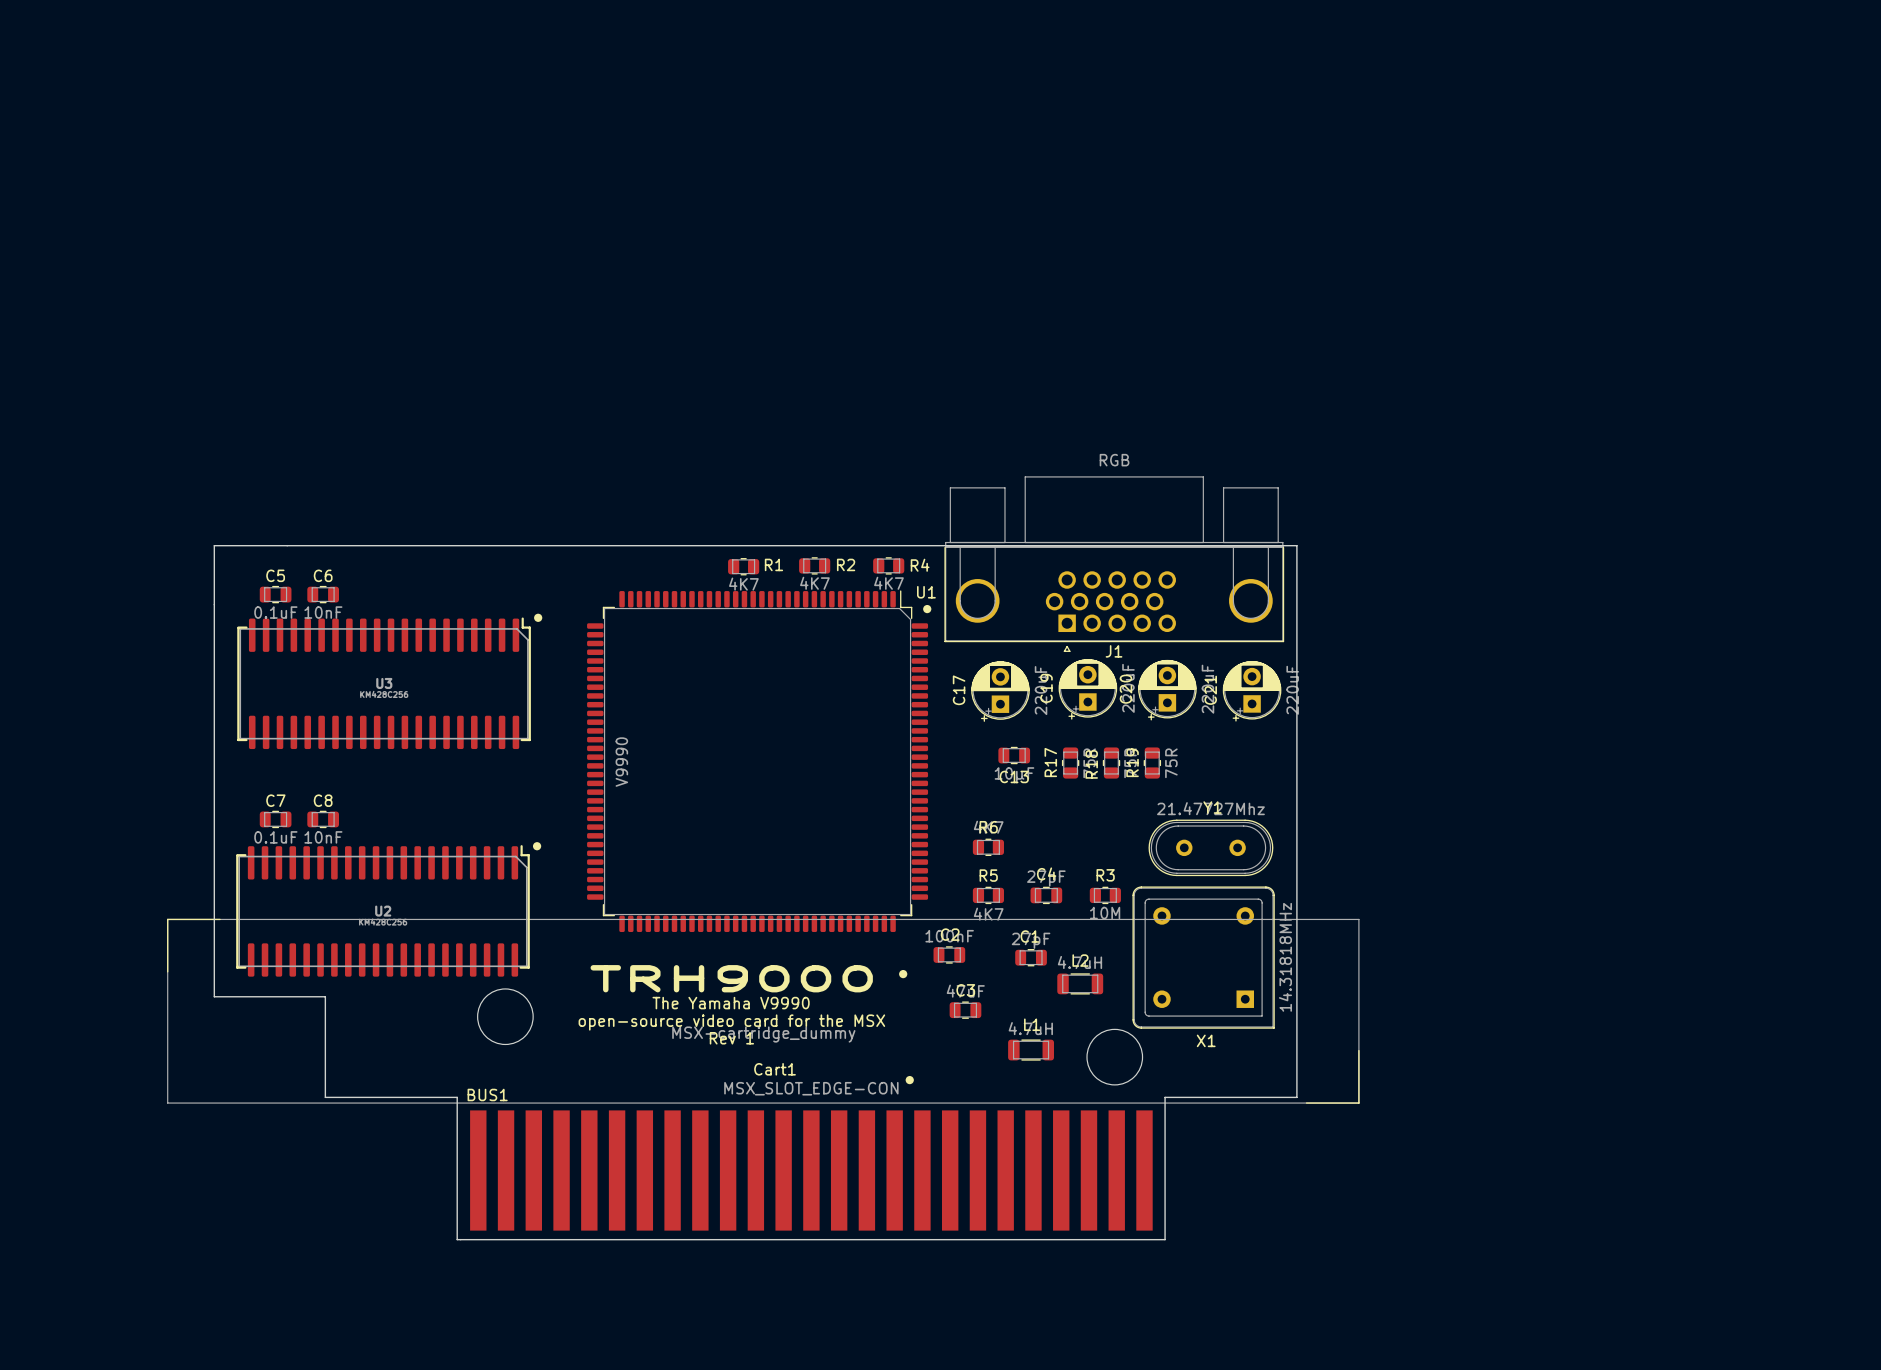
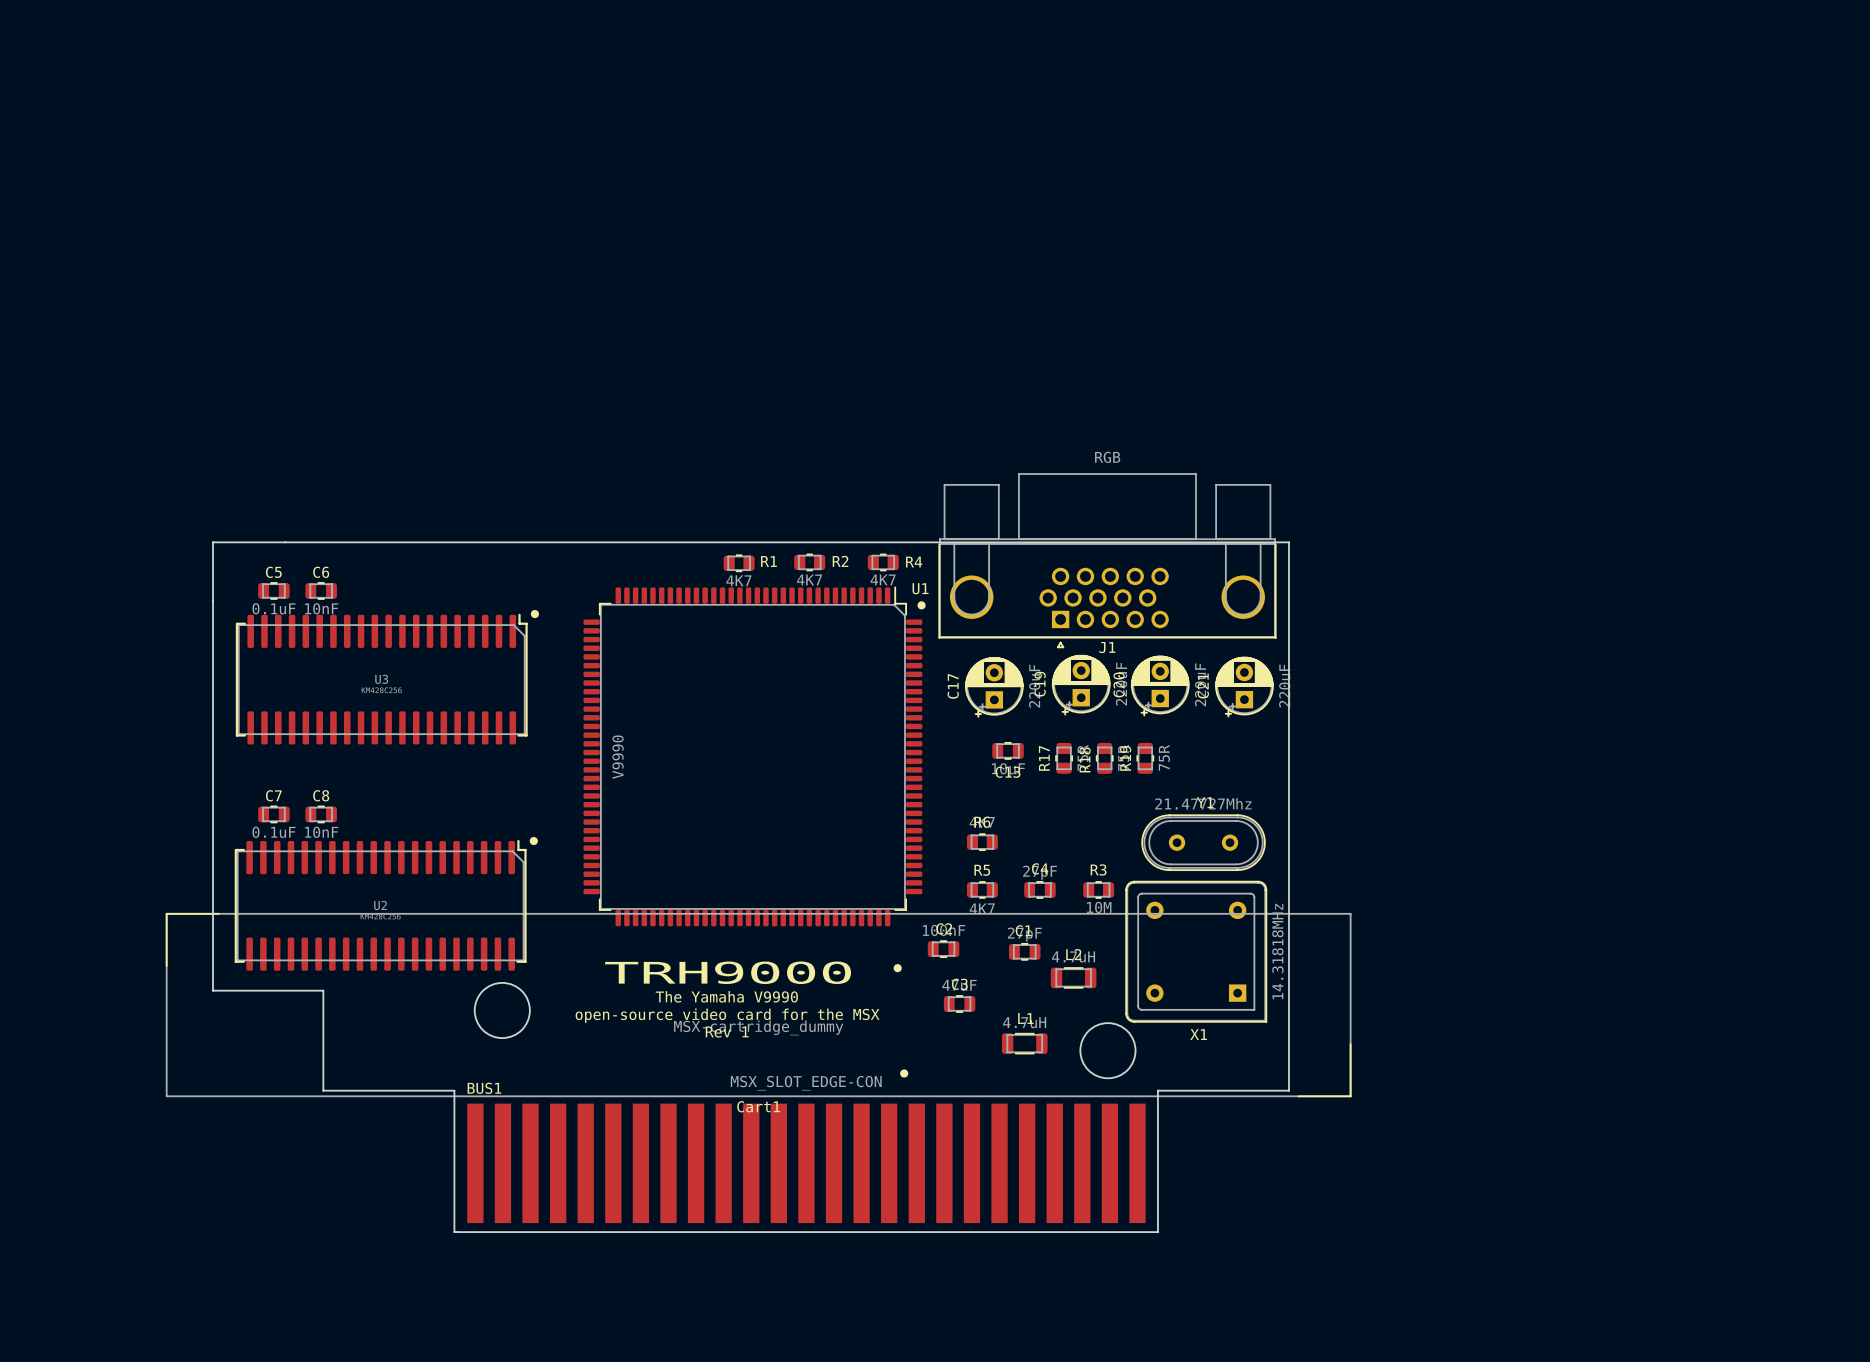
Cart1 name position: Cart1 (775, 1069) -> Cart1 (758, 1106)

